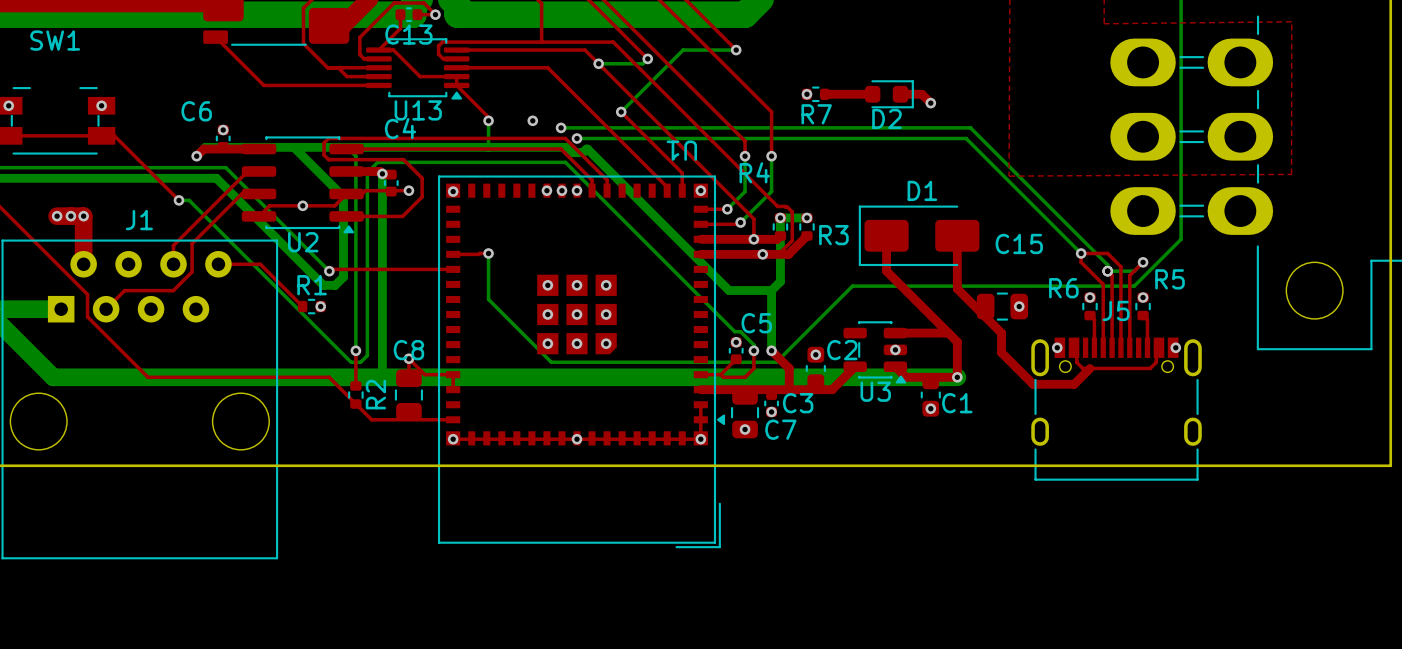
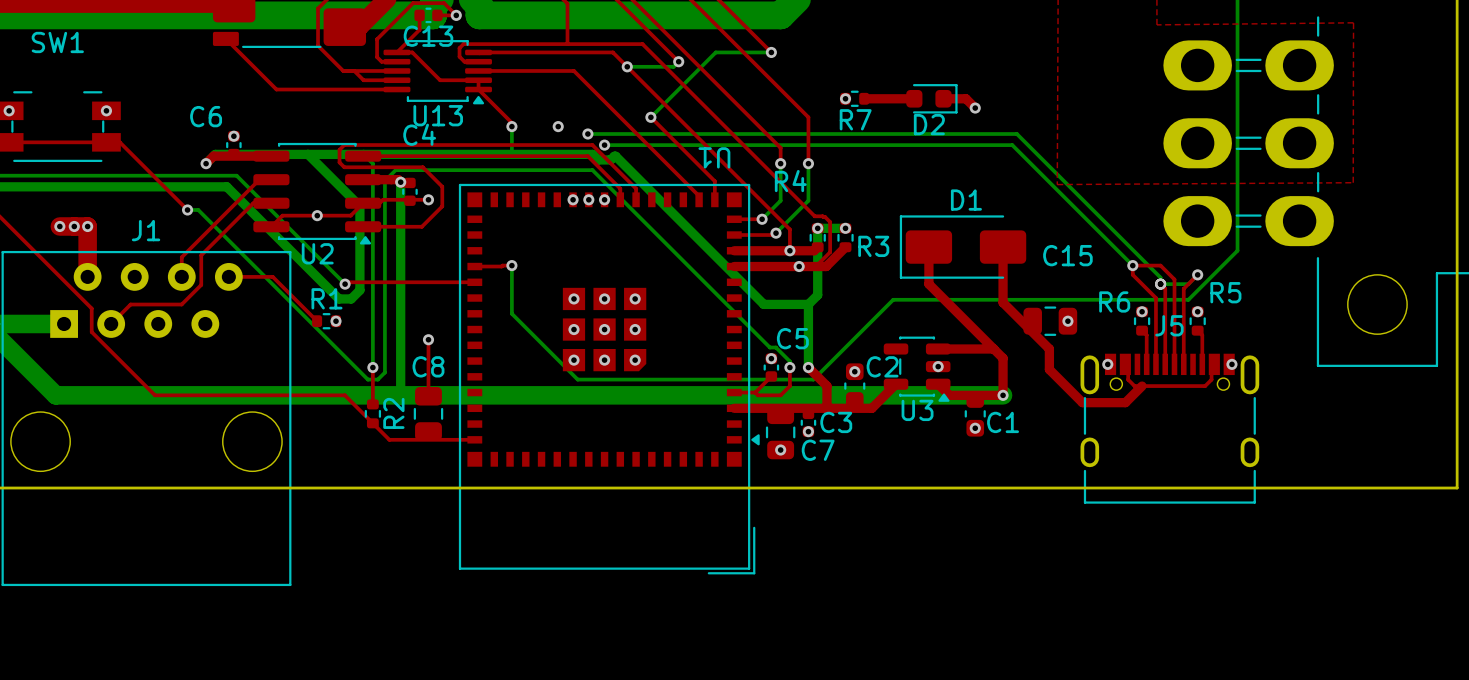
via: (700, 190) -> none
via: (453, 191) -> none
top track: (408, 358) (424, 374) (453, 374) (453, 389) -> (428, 375) (428, 339)
via position: (408, 358) -> (428, 339)
top track: (700, 404) (700, 438) -> none
top track: (453, 439) (700, 439) -> none
via: (453, 439) -> none
via: (577, 439) -> none
via: (700, 439) -> none

